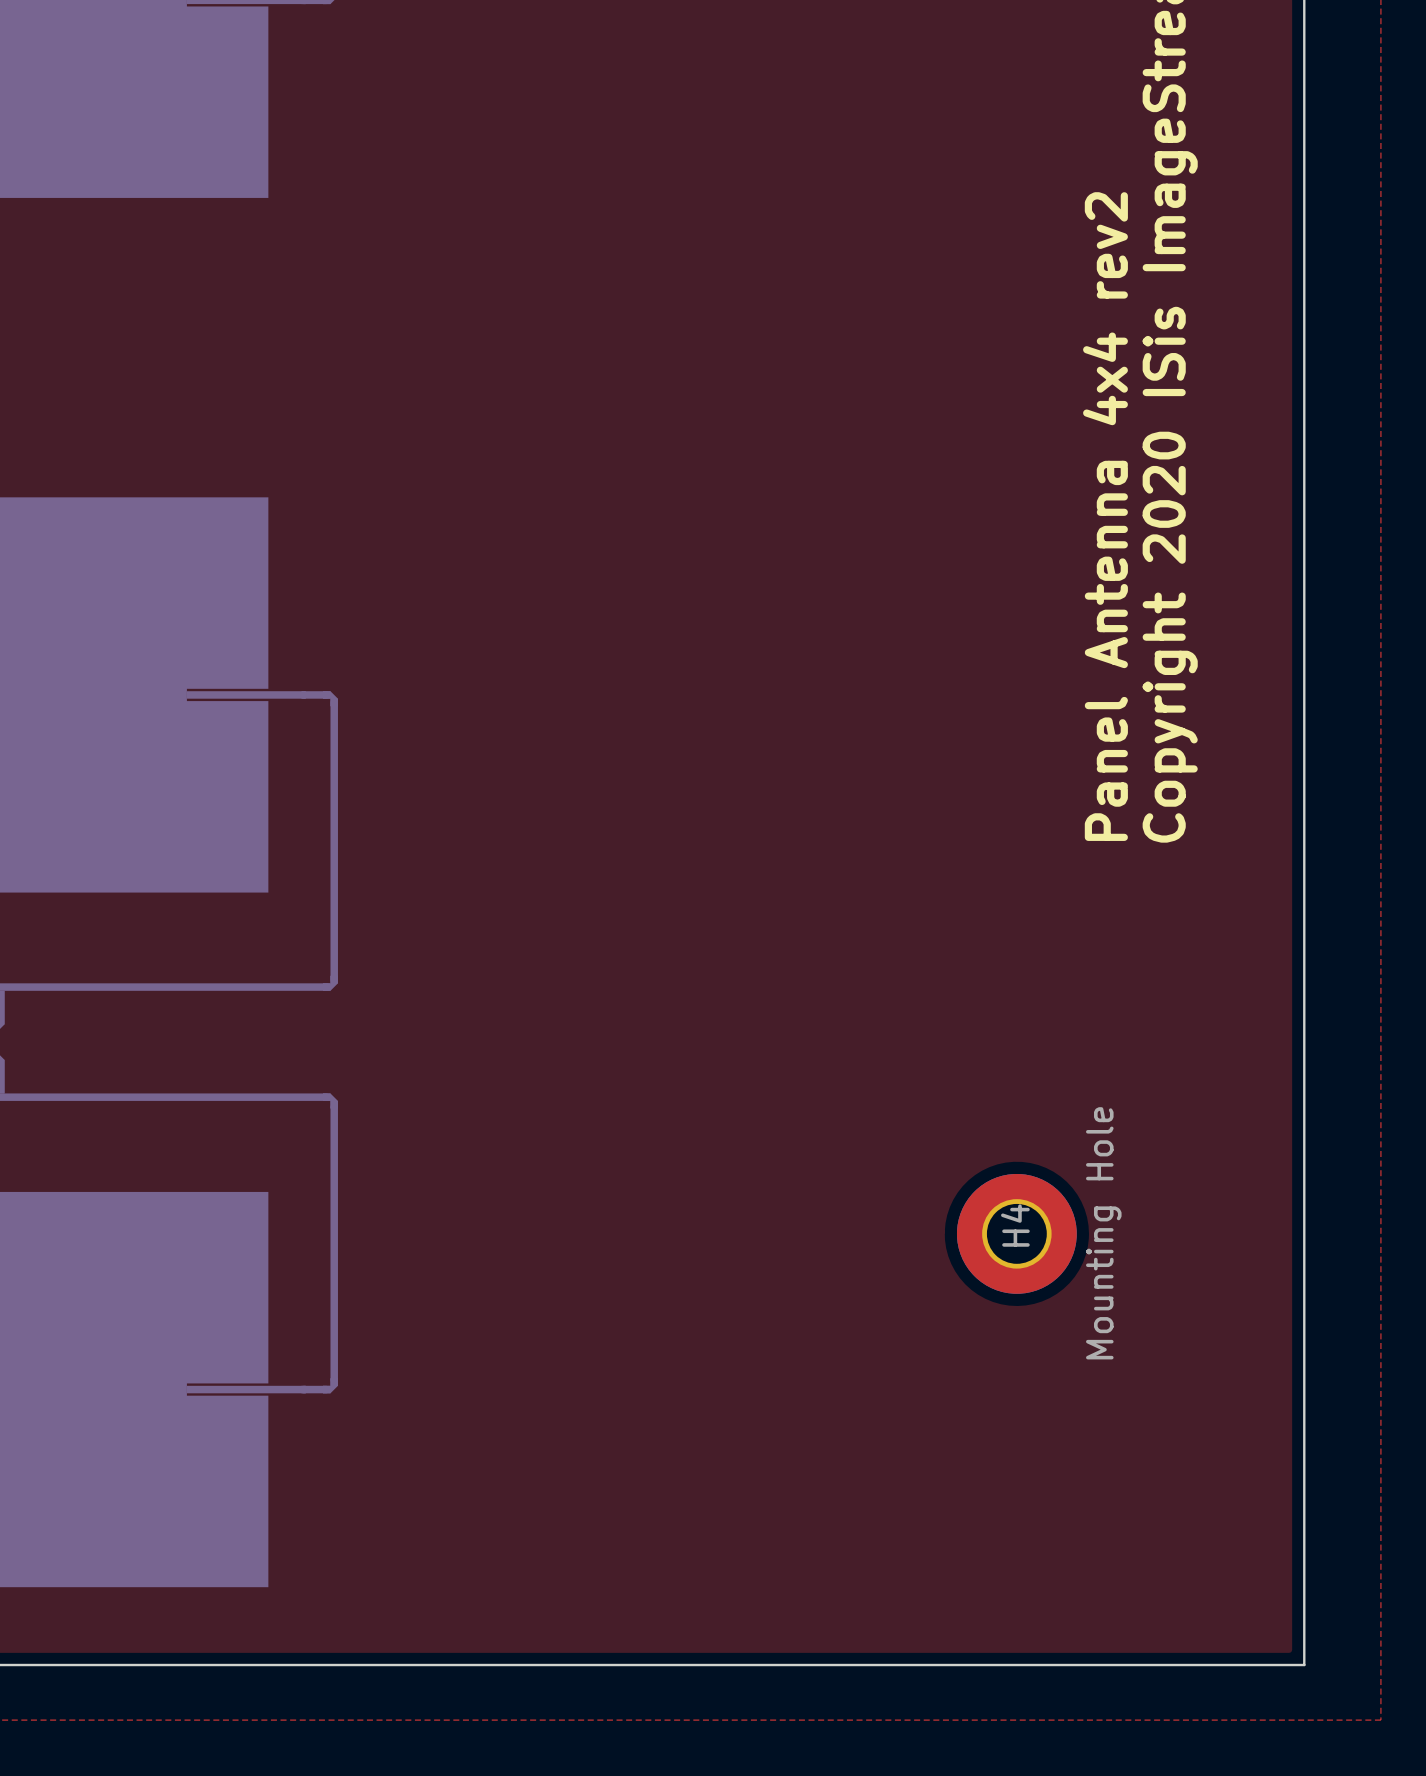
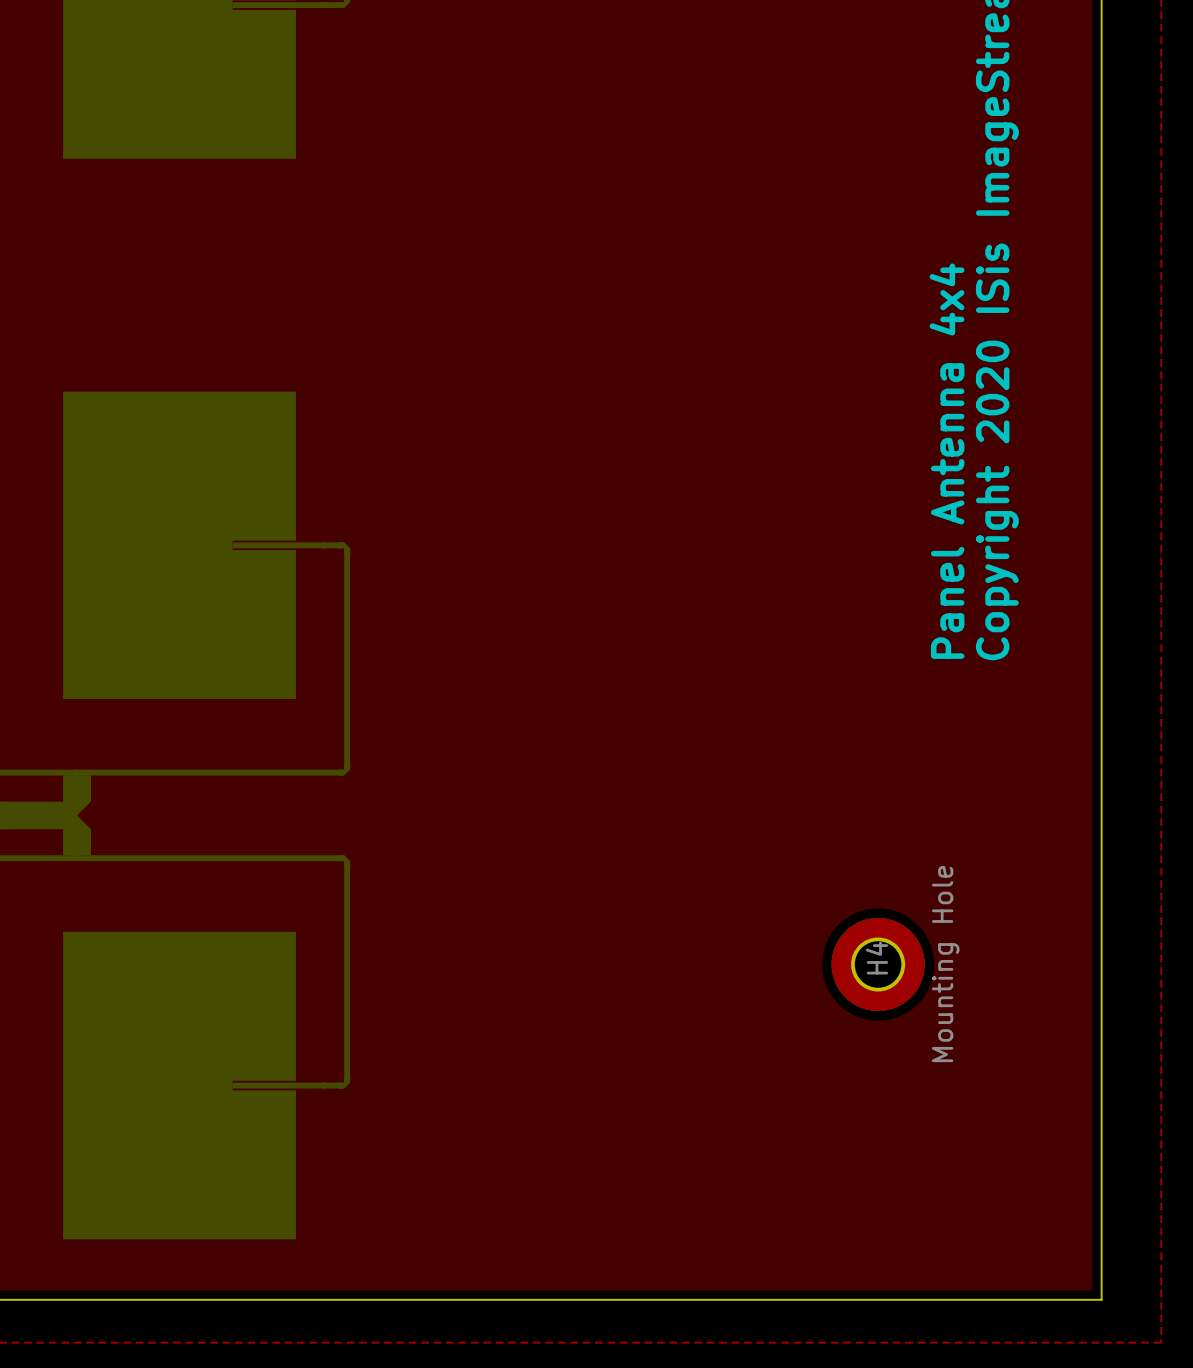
text: Panel Antenna 4x4 rev2 (1105, 516) -> Panel Antenna 4x4 (947, 461)

